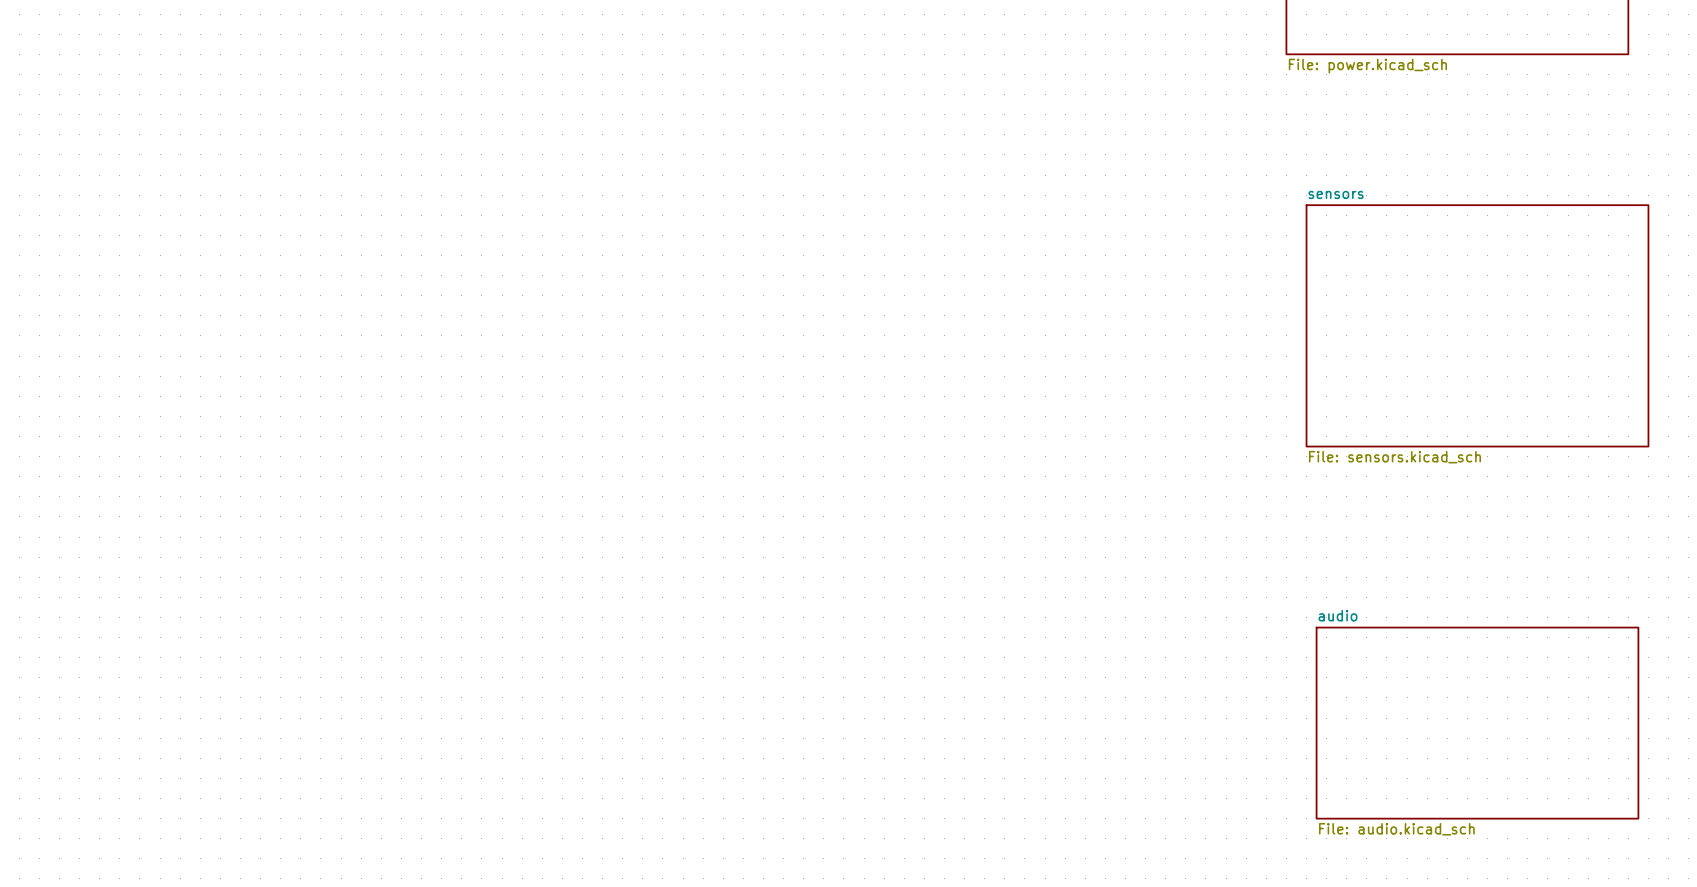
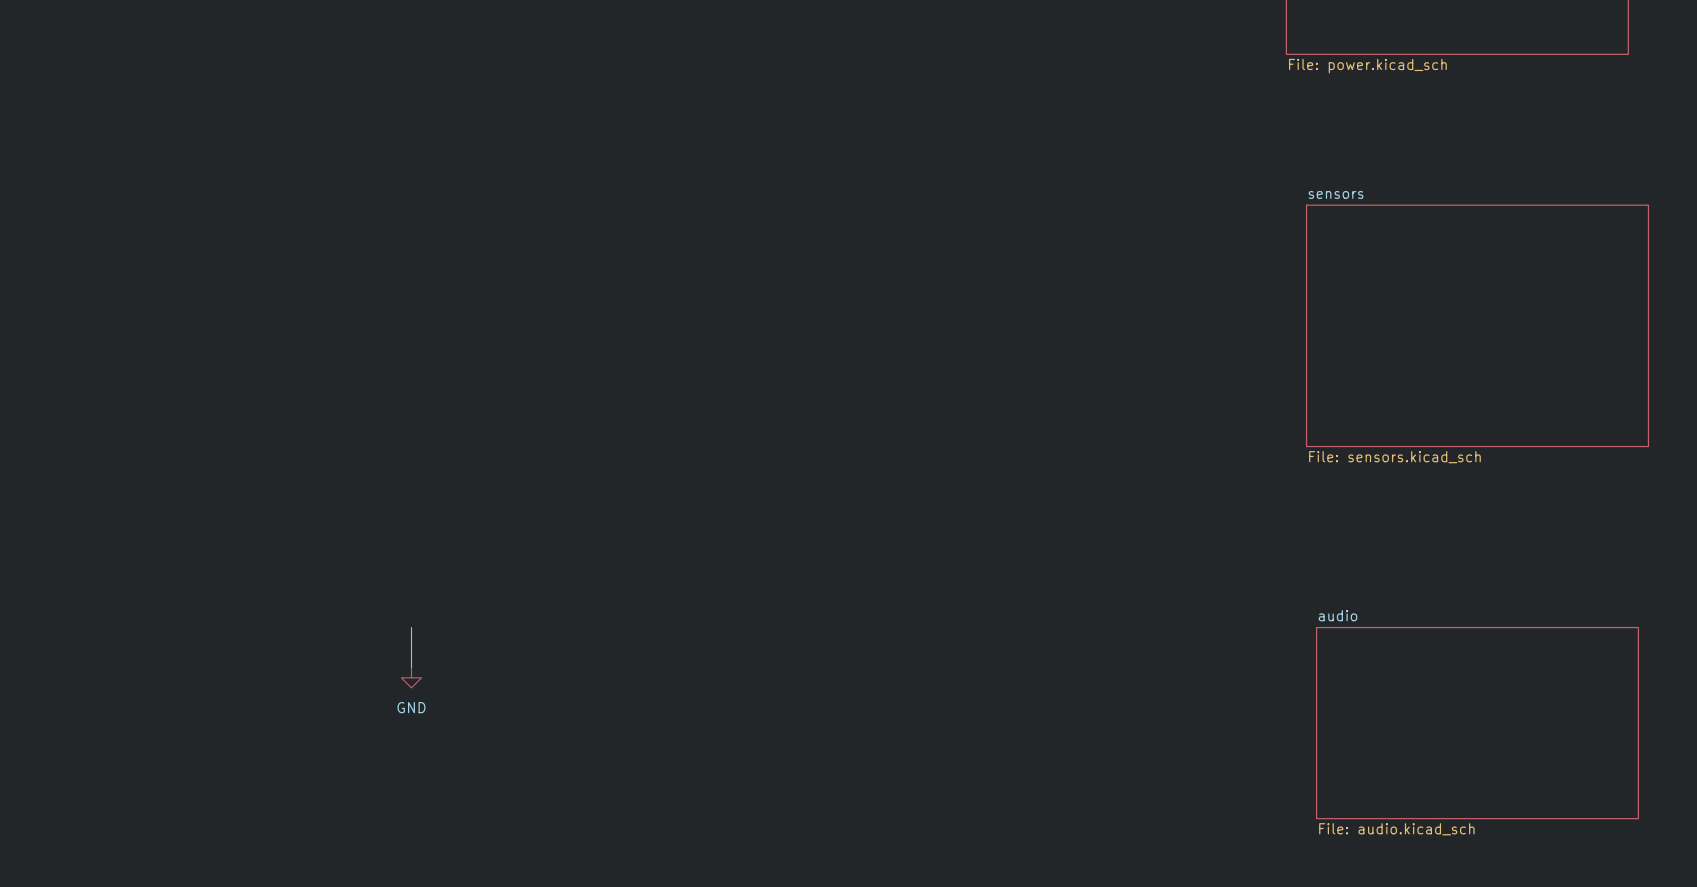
wire: none -> (411, 627) (411, 667)
power symbol: none -> GND (411, 677)

